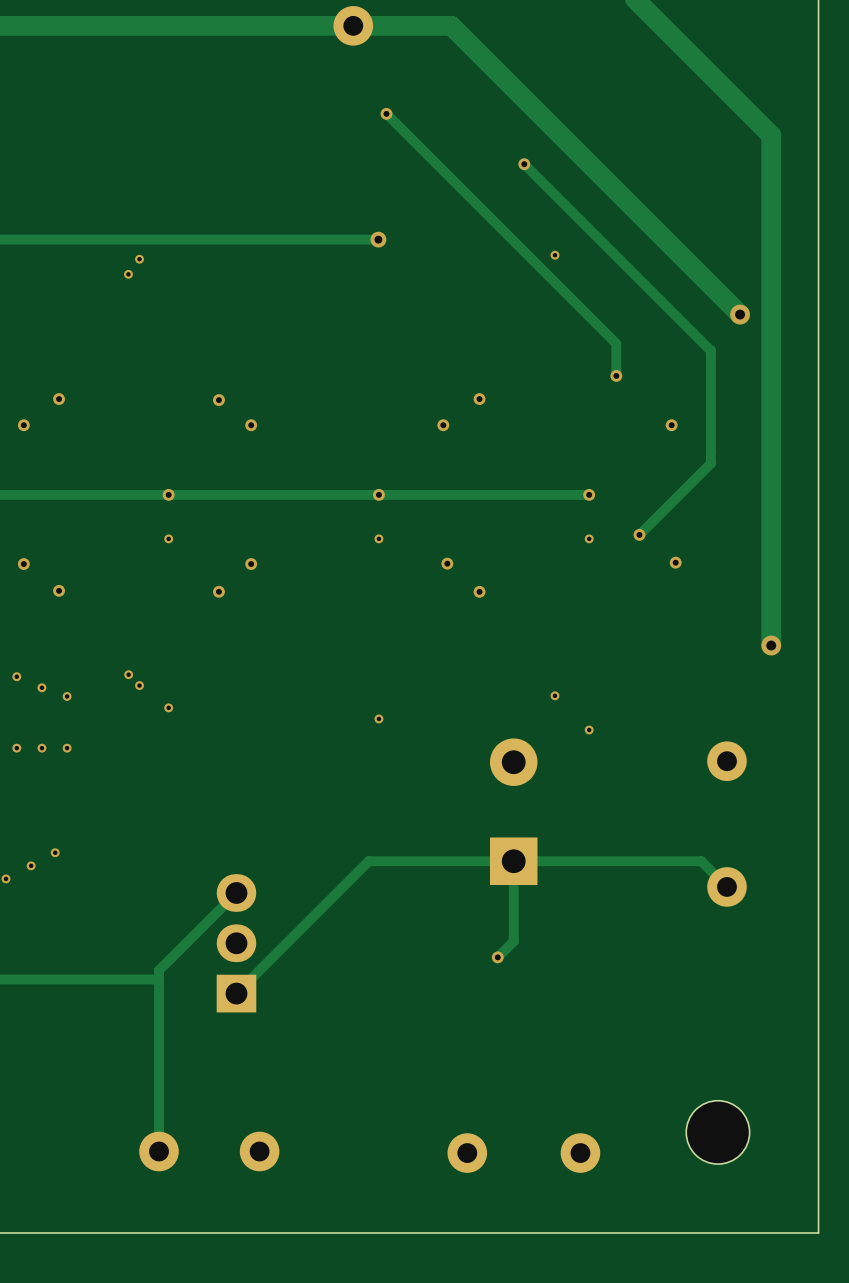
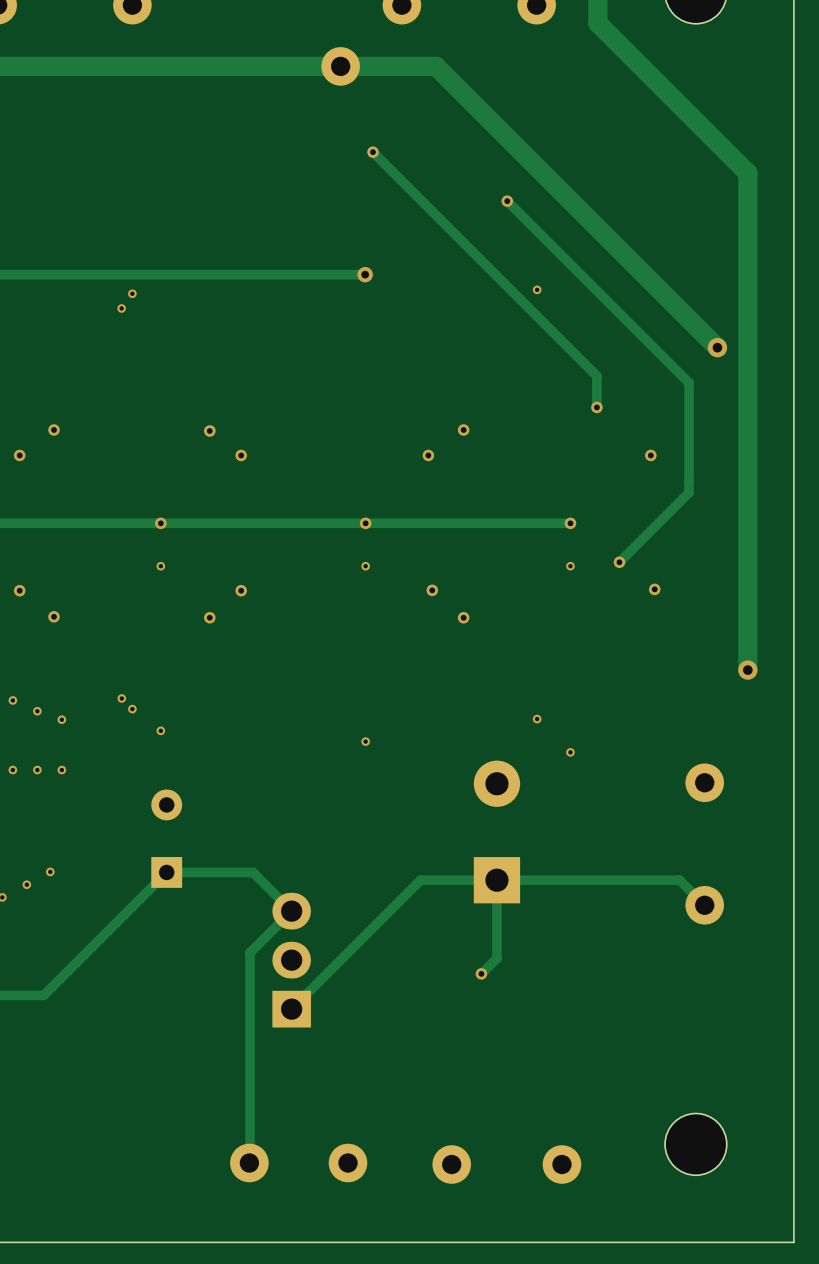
part: none -> (166, 838)
track: (435, 861) (368, 861) (236, 993) -> (420, 880) (291, 1009)
track: (236, 892) (159, 970) (159, 1151) -> none
part position: (236, 943) -> (291, 960)
track: (159, 979) (48, 979) -> (250, 1163) (250, 952) (291, 911) (252, 872) (166, 872) (43, 995)
part position: (159, 1151) -> (348, 1163)

